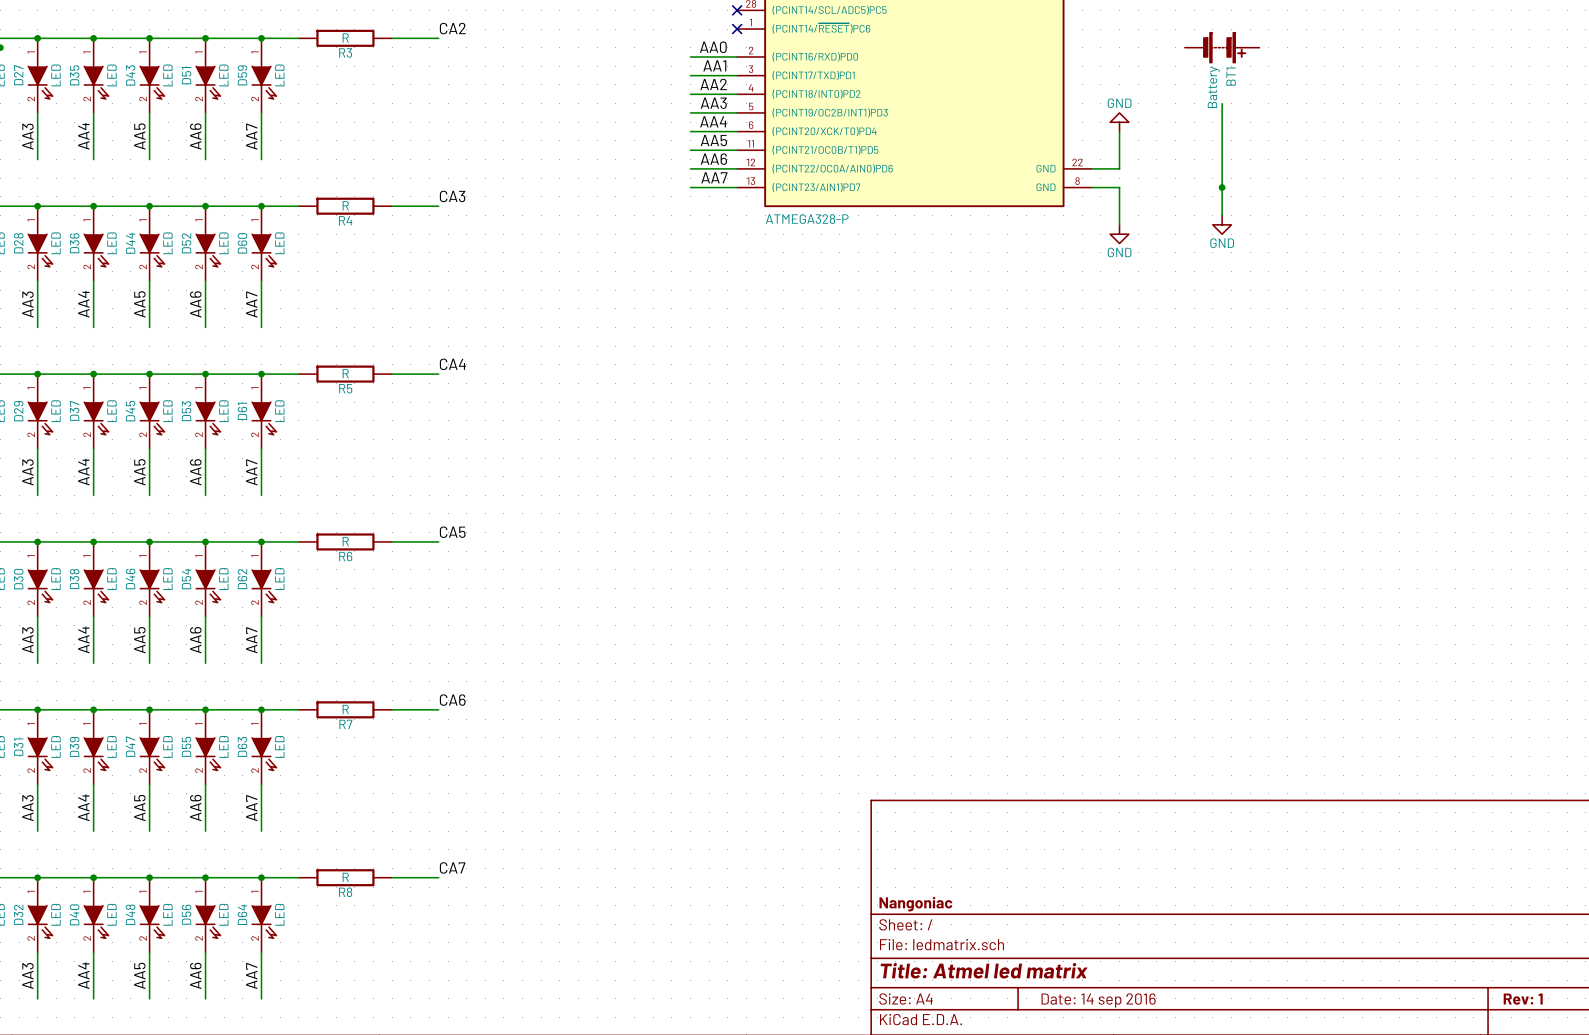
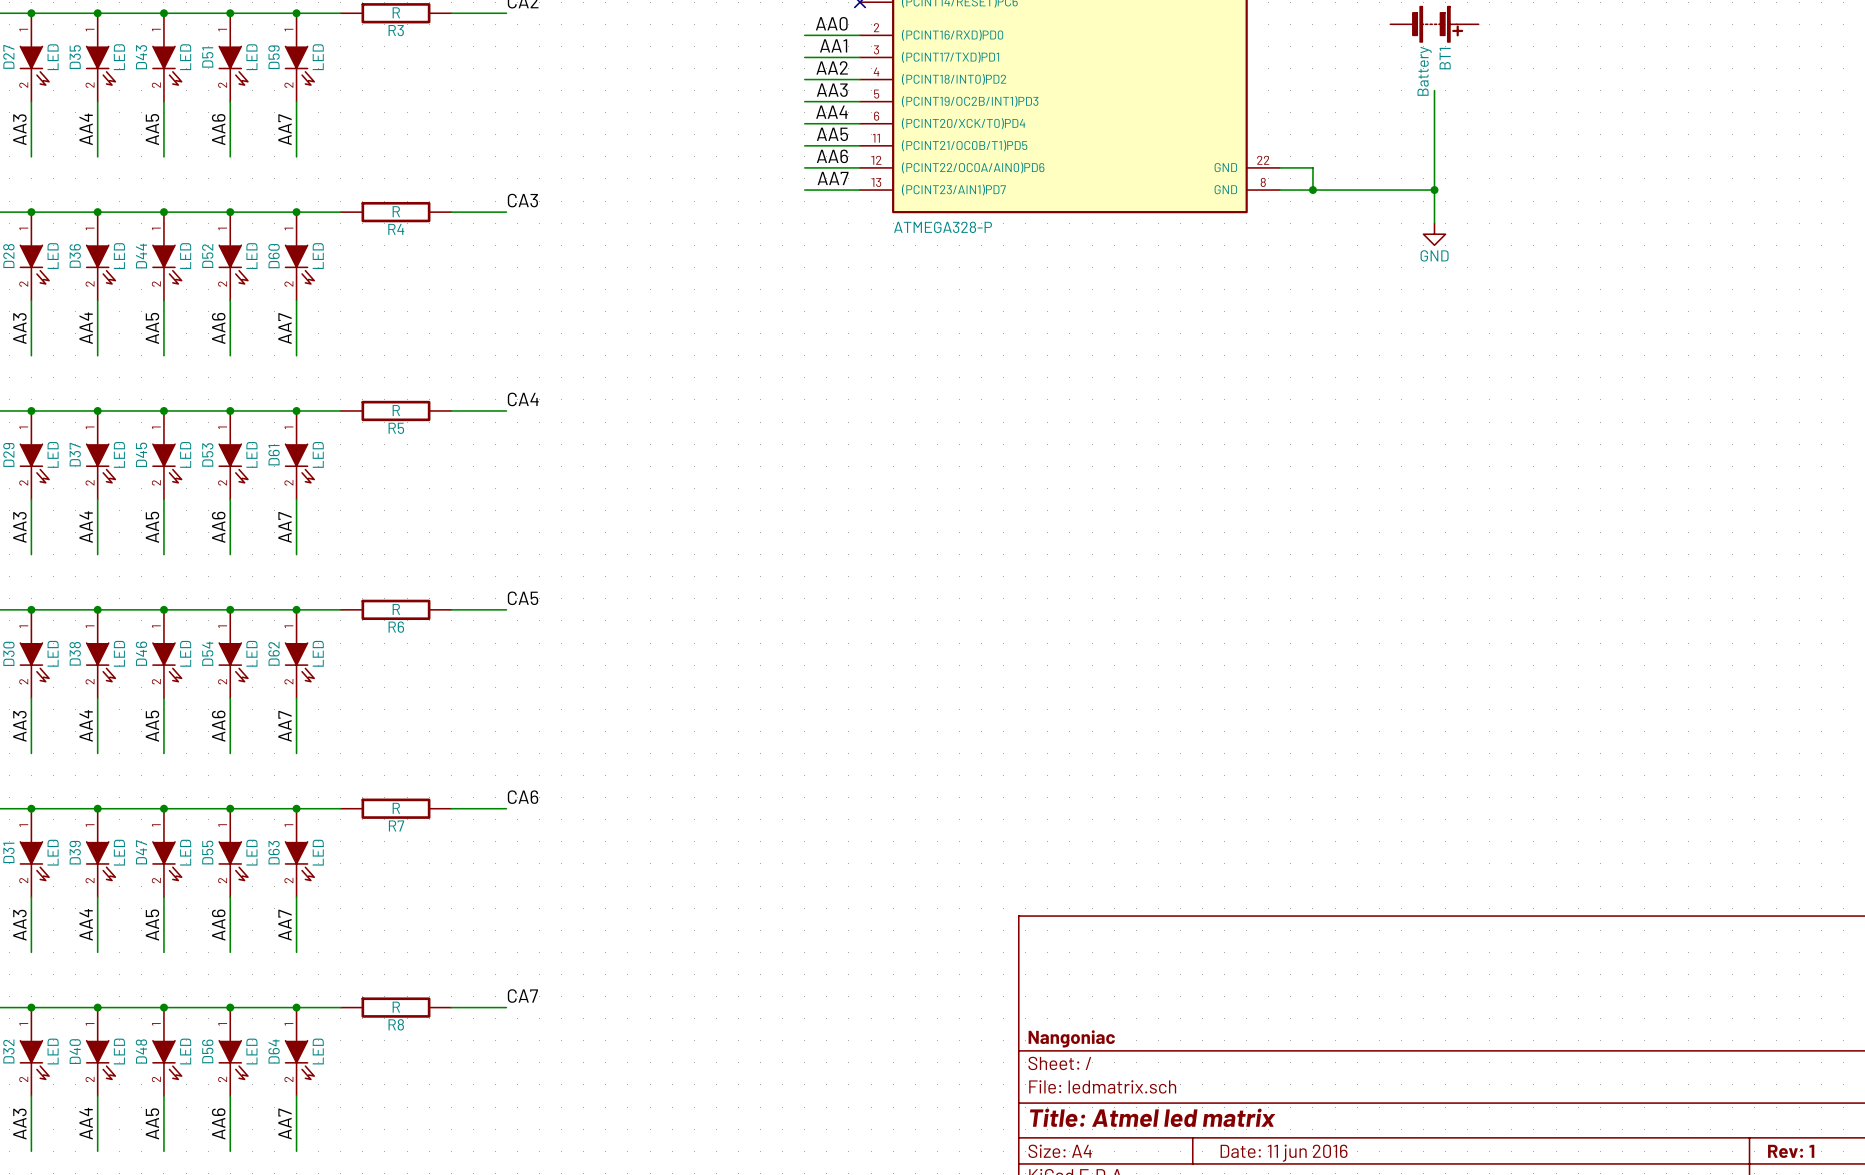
power symbol: GND (1119, 122) -> none
wire: (1119, 131) (1119, 168) -> (1434, 190) (1312, 190) (1312, 167)
wire: (1119, 187) (1119, 224) -> none
junction: none -> (1312, 190)
power symbol: GND (1119, 234) -> none
title block: Date: 14 sep 2016 (1098, 1000) -> Date: 11 jun 2016 (1284, 1153)

